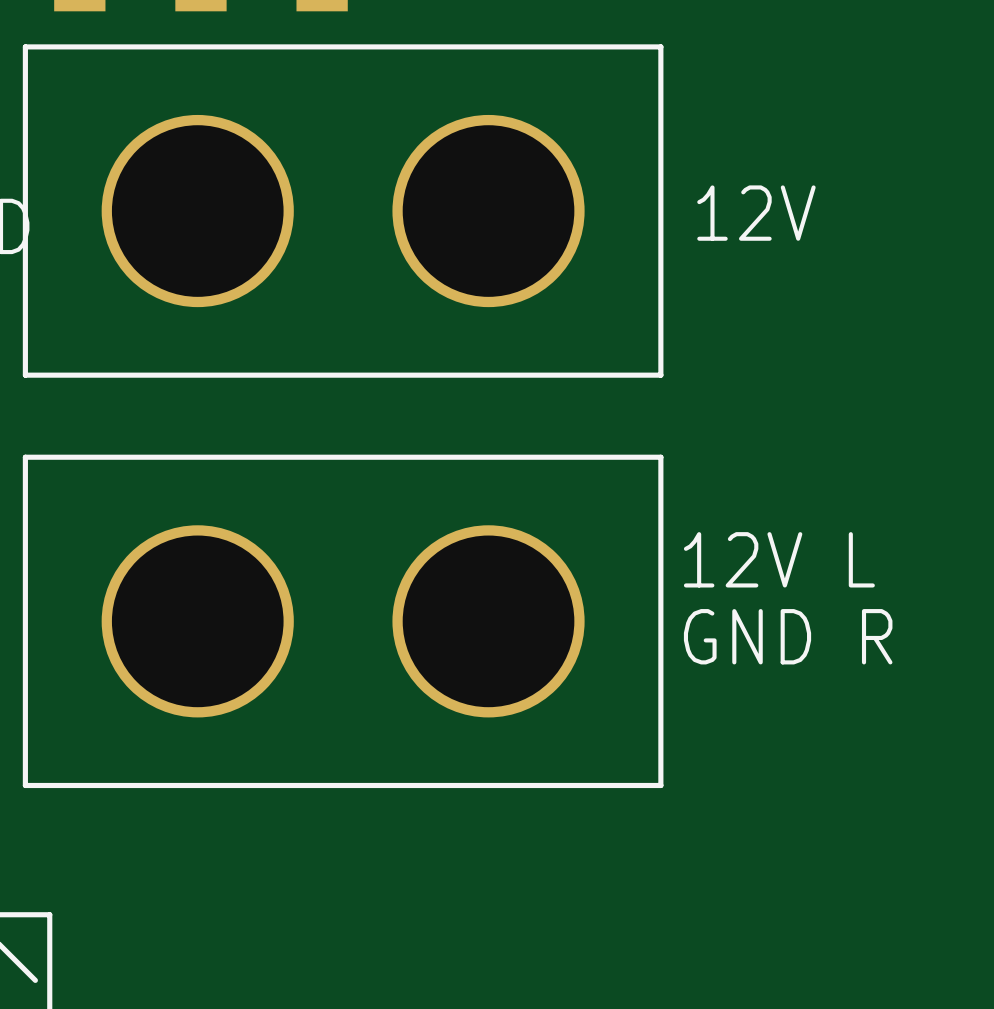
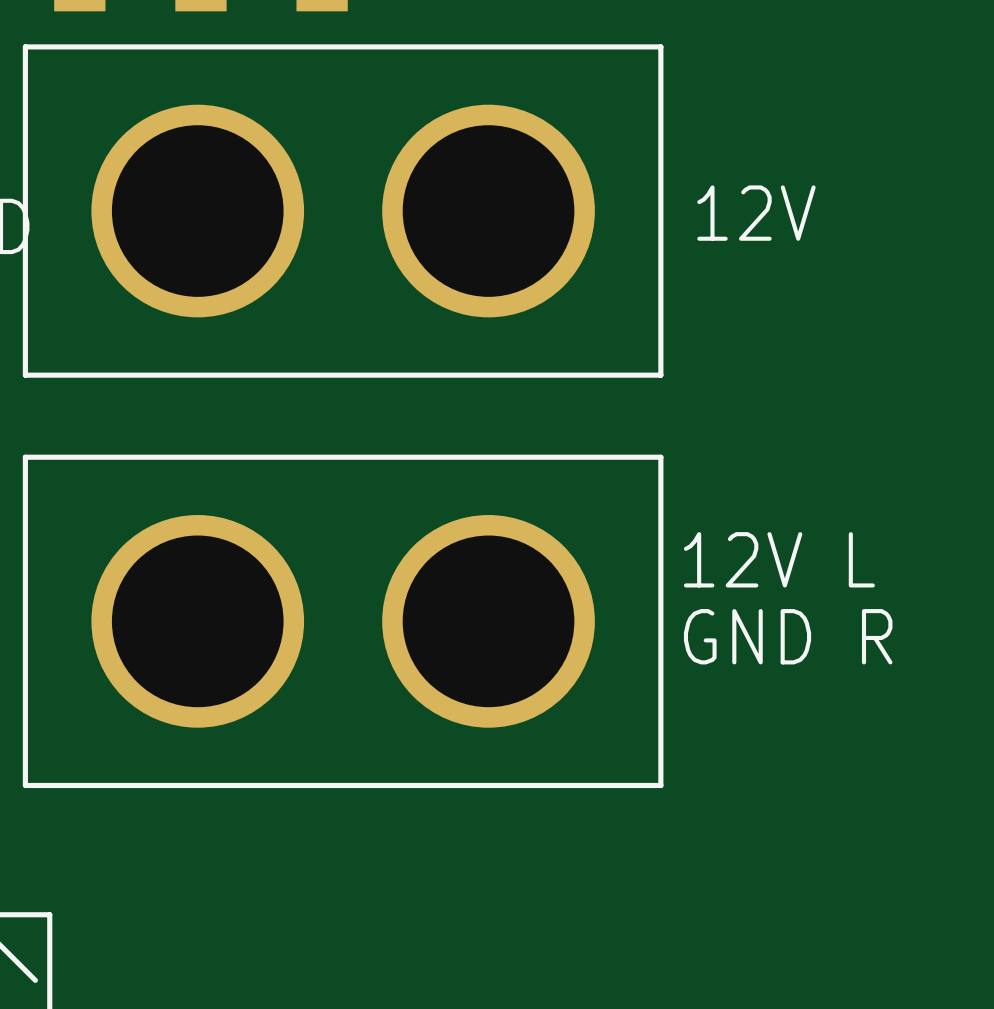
part footprint: [22, 44, 664, 378] -> [22, 44, 664, 378]
part footprint: [22, 454, 664, 789] -> [22, 454, 664, 789]

